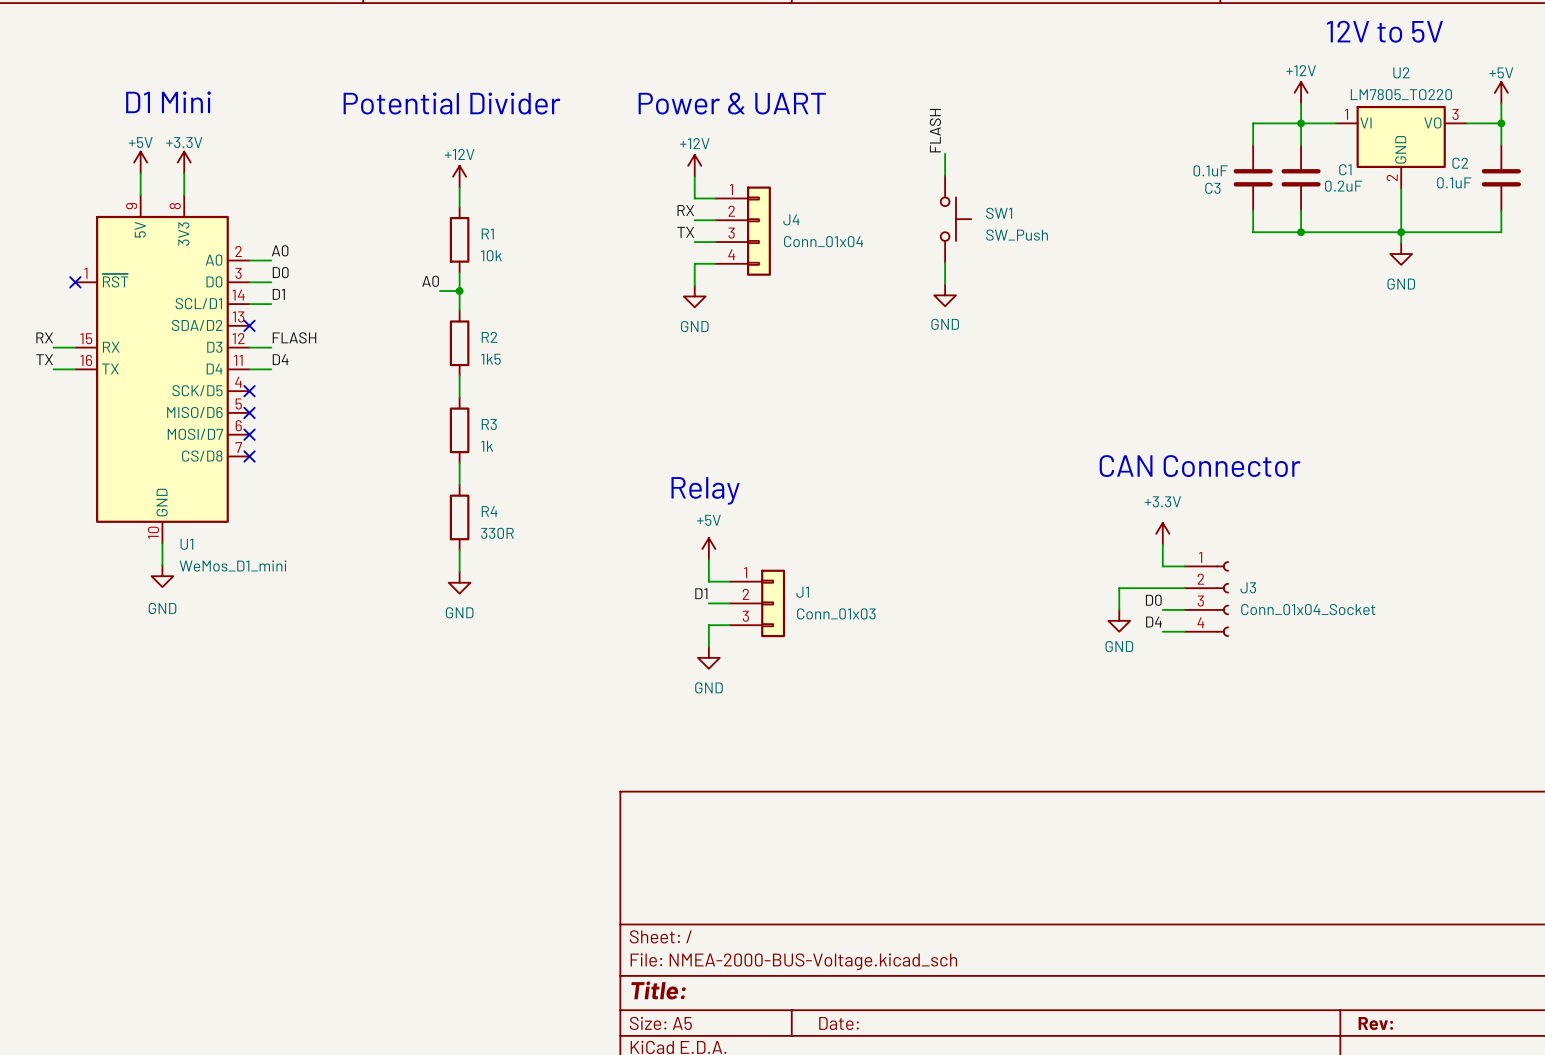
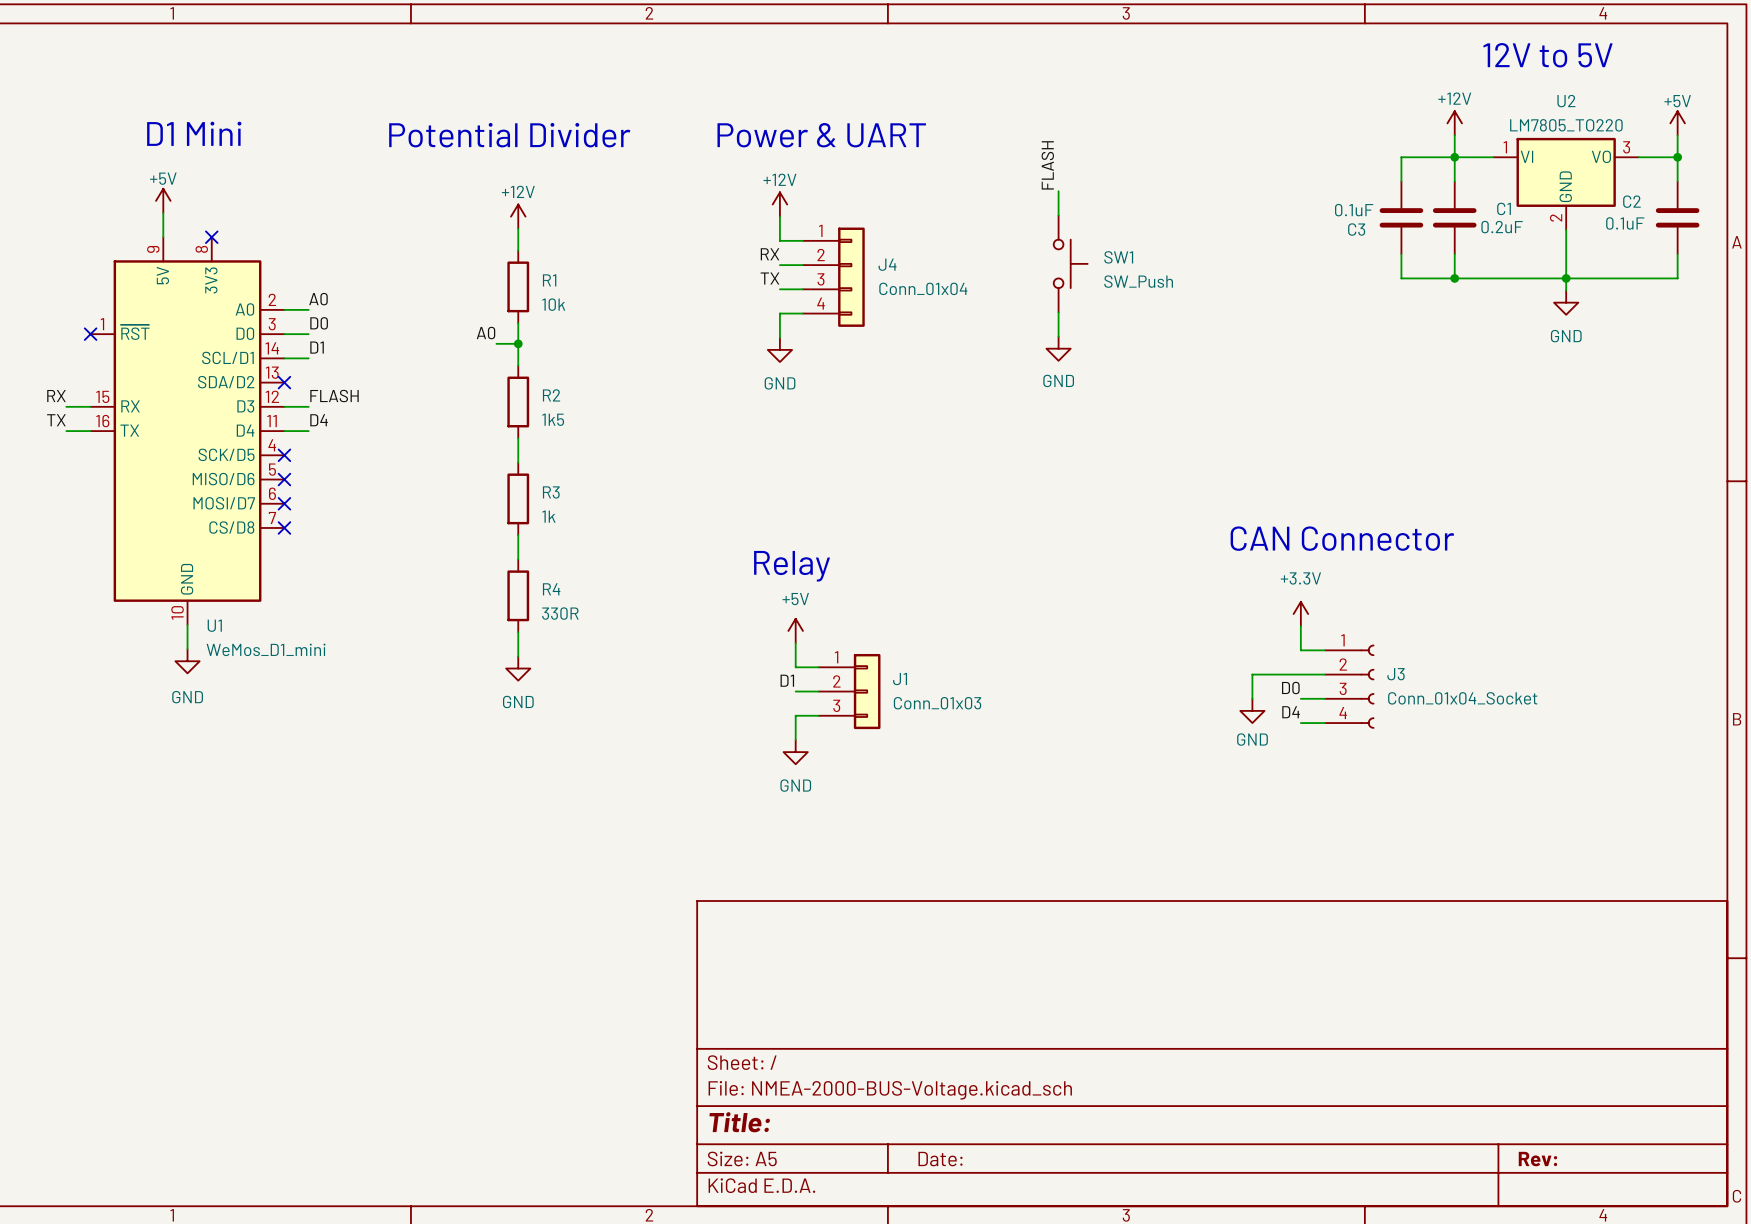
power symbol: +3.3V (184, 162) -> none
wire: (184, 173) (184, 195) -> none
no-connect mark: none -> (211, 237)

